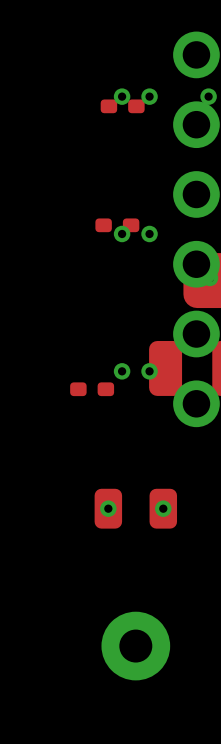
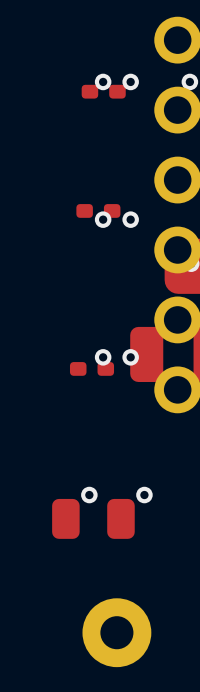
part position: (92, 389) -> (92, 368)
part position: (135, 508) -> (93, 518)

